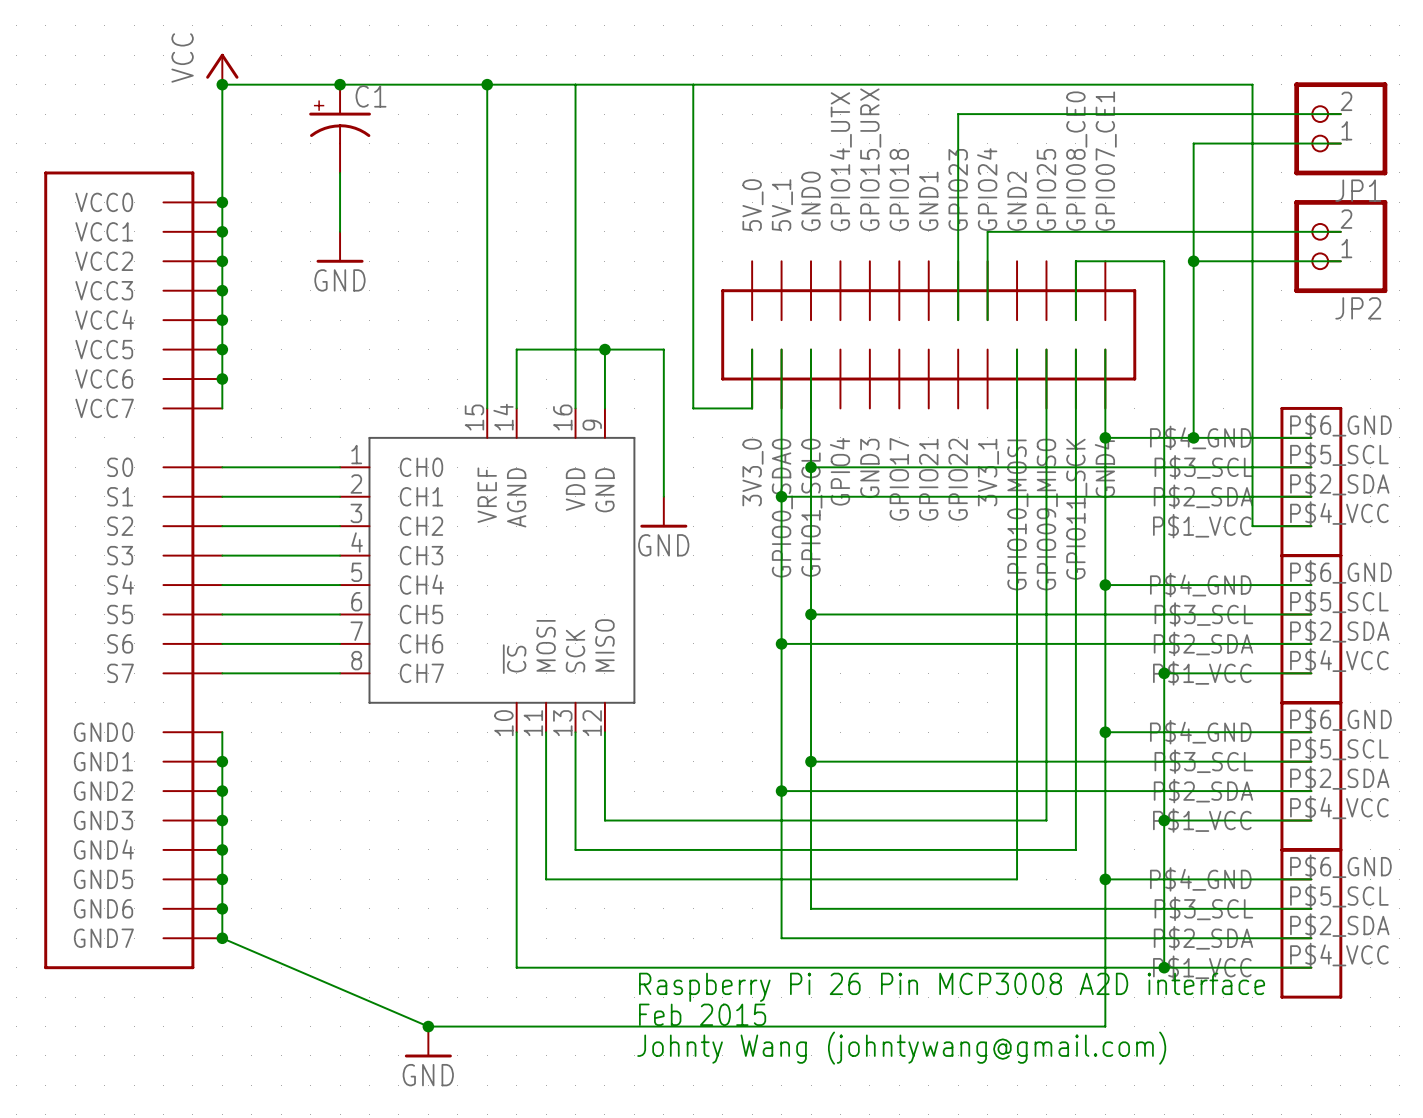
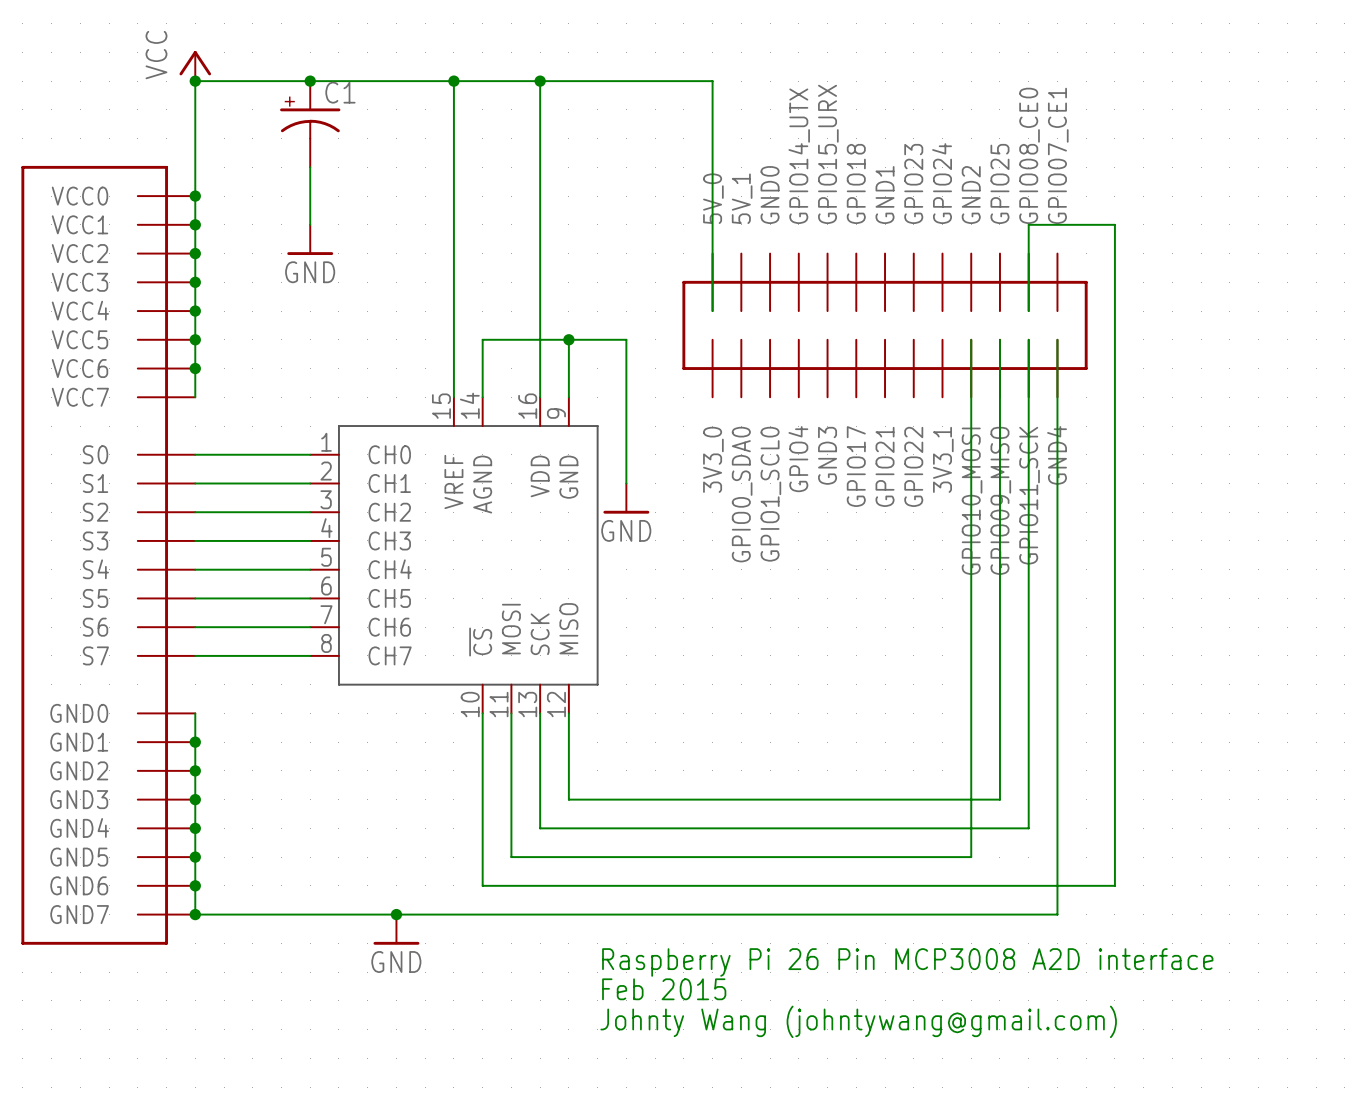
junction: none -> (540, 81)
wire: (693, 84) (693, 408) (752, 408) (752, 349) -> none
wire: (752, 84) (1252, 84) (1252, 526) (1311, 526) -> (712, 81) (712, 311)
wire: (1340, 114) (958, 114) (958, 320) -> none
JP1: (1340, 128) -> none
wire: (1340, 143) (1193, 143) (1193, 437) -> none
wire: (1075, 231) (987, 231) (987, 320) -> none
wire: (1164, 231) (1340, 231) -> (1114, 224) (1114, 253)
JP2: (1340, 246) -> none
wire: (1075, 261) (1164, 261) -> (1028, 253) (1028, 224)
wire: (1193, 261) (1340, 261) -> none
junction: (1193, 261) -> none
wire: (781, 349) (781, 938) -> none
wire: (811, 349) (811, 908) -> none
wire: (1105, 437) (1311, 437) -> none
junction: (1105, 437) -> none
junction: (1193, 437) -> none
wire: (811, 467) (1311, 467) -> none
junction: (811, 467) -> none
part: (1311, 482) -> none
wire: (781, 496) (1311, 496) -> none
junction: (781, 496) -> none
wire: (1105, 585) (1311, 585) -> none
junction: (1105, 585) -> none
wire: (811, 614) (1311, 614) -> none
junction: (811, 614) -> none
part: (1311, 629) -> none
wire: (781, 643) (1311, 643) -> none
junction: (781, 643) -> none
wire: (1164, 673) (1311, 673) -> none
junction: (1164, 673) -> none
wire: (1105, 732) (1311, 732) -> none
junction: (1105, 732) -> none
wire: (811, 761) (1311, 761) -> none
junction: (811, 761) -> none
part: (1311, 776) -> none
wire: (781, 791) (1311, 791) -> none
junction: (781, 791) -> none
wire: (1164, 820) (1311, 820) -> none
junction: (1164, 820) -> none
wire: (1105, 879) (1311, 879) -> none
junction: (1105, 879) -> none
wire: (516, 908) (516, 967) (1311, 967) -> (482, 885) (770, 885)
wire: (1311, 908) (1164, 908) (1164, 967) -> none
part: (1311, 923) -> none
wire: (222, 938) (428, 1026) (1105, 1026) (1105, 938) (1311, 938) -> (195, 914) (741, 914)
junction: none -> (396, 914)
junction: (1164, 967) -> none
junction: (428, 1026) -> none
power symbol position: GND (428, 1042) -> GND (396, 929)

